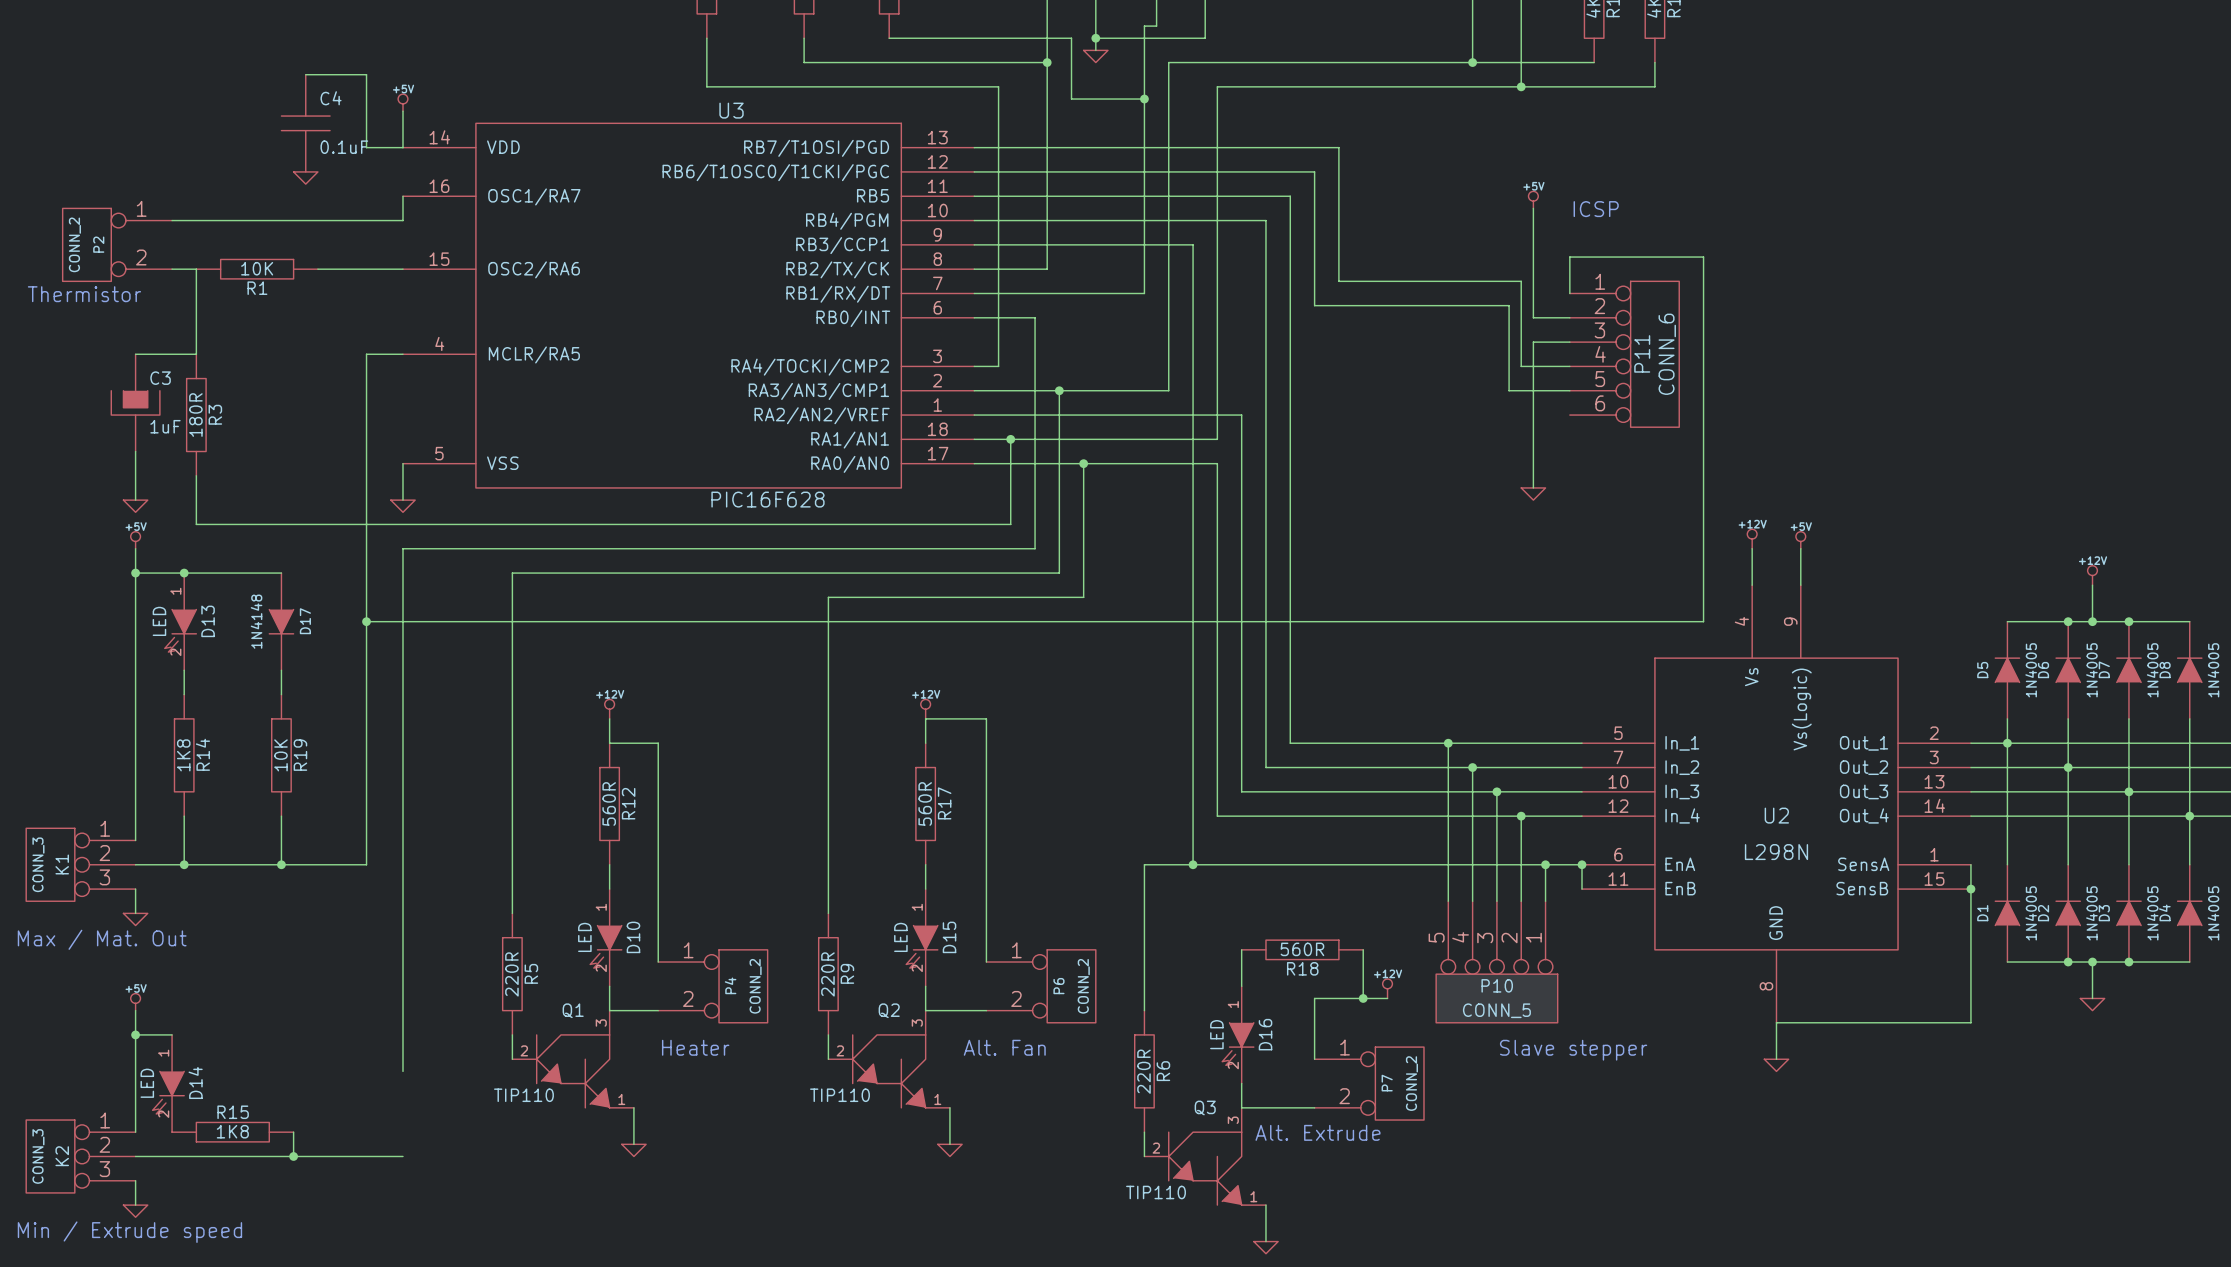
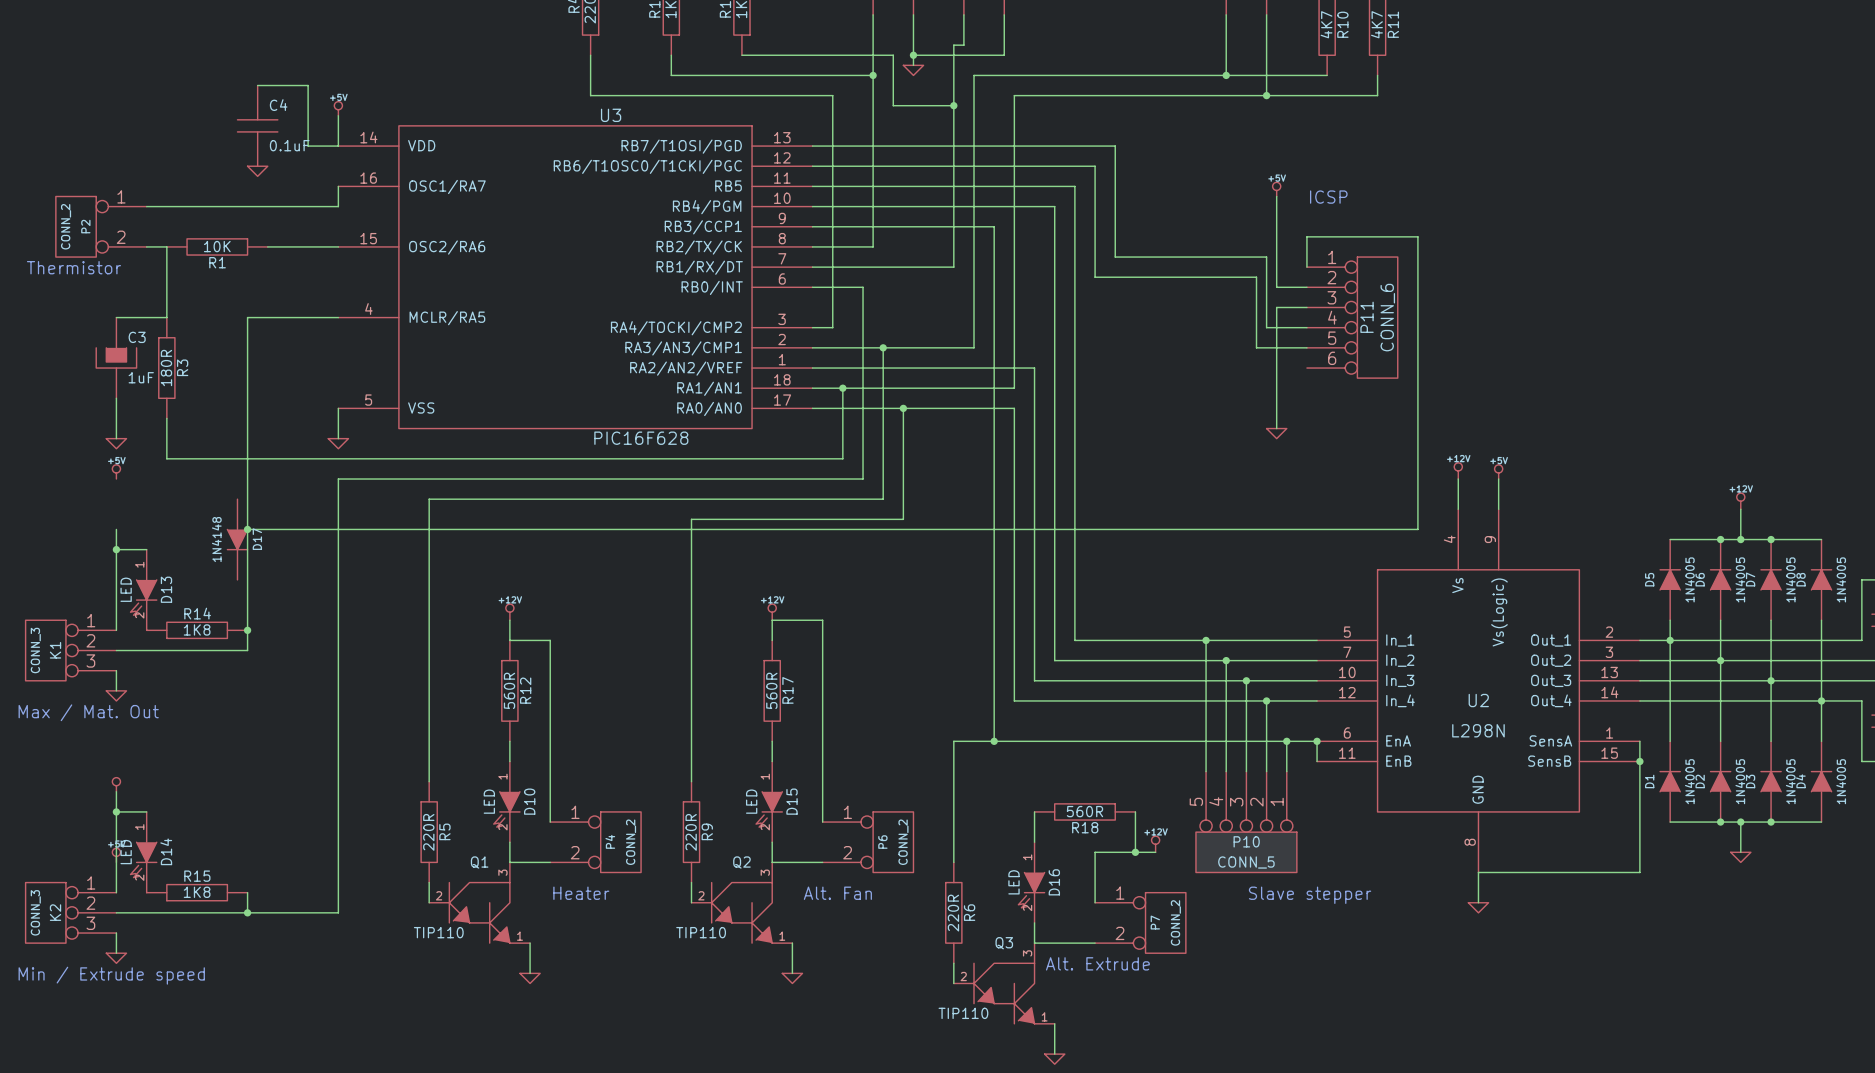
wire: (366, 354) (366, 864) (135, 864) -> (308, 317) (247, 317) (247, 650) (116, 650)
wire: (135, 548) (135, 609) -> none
wire: (135, 573) (281, 573) -> none
junction: (135, 573) -> none
junction: (184, 573) -> none
junction: none -> (247, 529)
wire: (1703, 609) (1703, 621) (366, 621) -> (1417, 529) (247, 529)
D13 position: (180, 621) -> (143, 589)
junction: (366, 621) -> none
wire: none -> (116, 549) (146, 549)
junction: none -> (116, 549)
wire: (184, 670) (184, 694) -> none
wire: (281, 670) (281, 694) -> none
wire: (135, 731) (135, 779) -> none
junction: none -> (247, 630)
R14 name position: R14 (202, 754) -> R14 (197, 613)
R14 rotation: 0° (184, 755) -> 90° clockwise (197, 630)
R19: 10K (281, 755) -> none
wire: (135, 803) (135, 840) -> none
power symbol: none -> (116, 695)
wire: (184, 816) (184, 864) -> none
wire: (281, 816) (281, 864) -> none
K1 position: (80, 864) -> (71, 650)
junction: (184, 864) -> none
junction: (281, 864) -> none
wire: (135, 889) (135, 913) -> none
power symbol shape: [123, 913, 148, 926] -> [112, 777, 121, 792]
wire: none -> (116, 791) (116, 862)
text position: Max / Mat. Out (102, 939) -> Max / Mat. Out (88, 712)
junction: none -> (116, 811)
wire: (135, 1034) (172, 1034) -> (116, 811) (146, 811)
junction: (135, 1034) -> none
wire: (135, 1047) (135, 1095) -> none
junction: none -> (247, 912)
D14 position: (168, 1083) -> (143, 852)
wire: (135, 1120) (135, 1132) -> none
R15 position: (232, 1132) -> (197, 892)
wire: (293, 1132) (293, 1156) -> (247, 892) (247, 912)
K2 position: (80, 1156) -> (71, 912)
wire: (135, 1156) (402, 1156) -> (116, 912) (338, 912)
junction: (293, 1156) -> none
wire: (135, 1180) (135, 1205) -> none
power symbol position: (135, 1211) -> (116, 958)
text position: Min / Extrude speed (129, 1232) -> Min / Extrude speed (111, 975)

